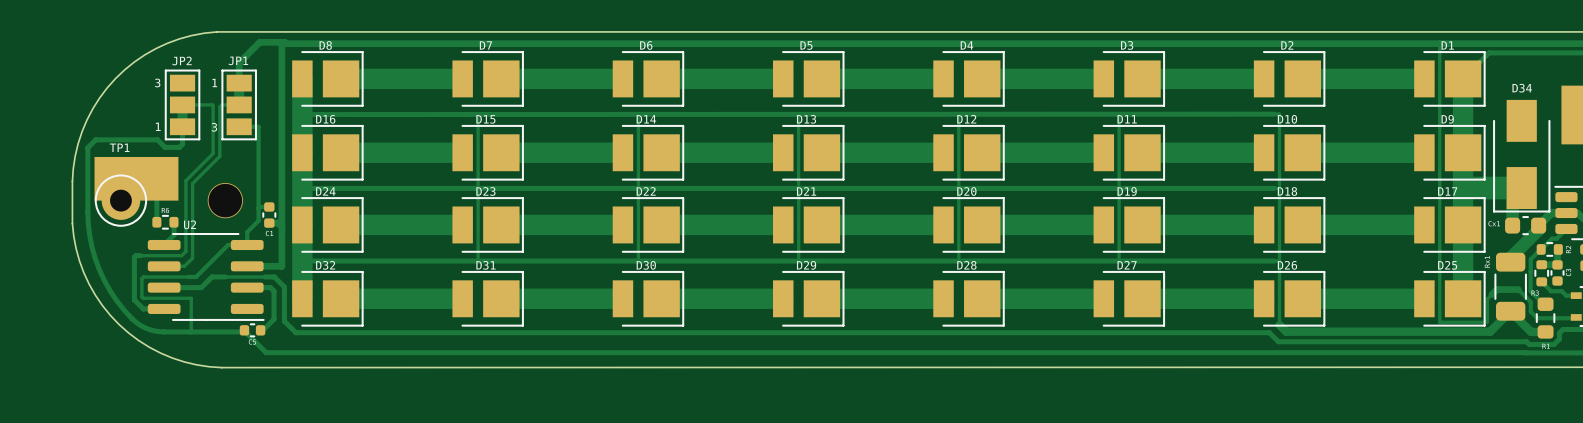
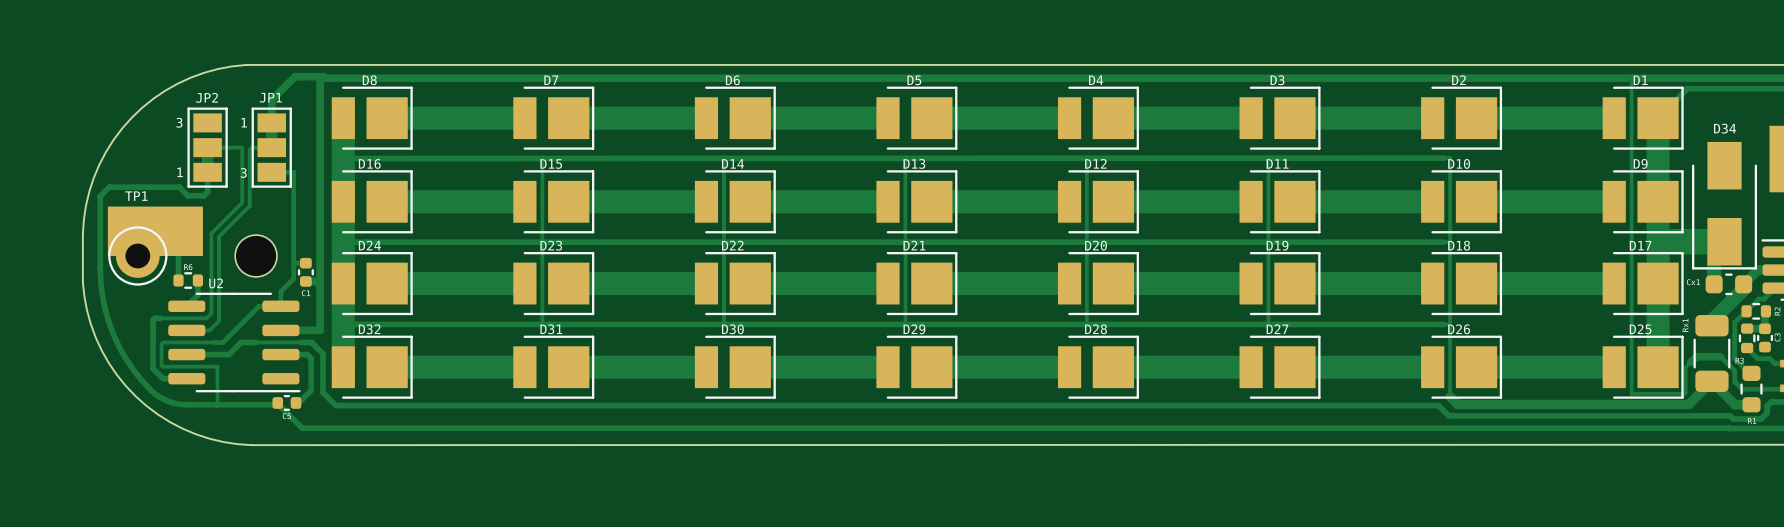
part footprint: [207, 182, 243, 219] -> [235, 235, 277, 277]

